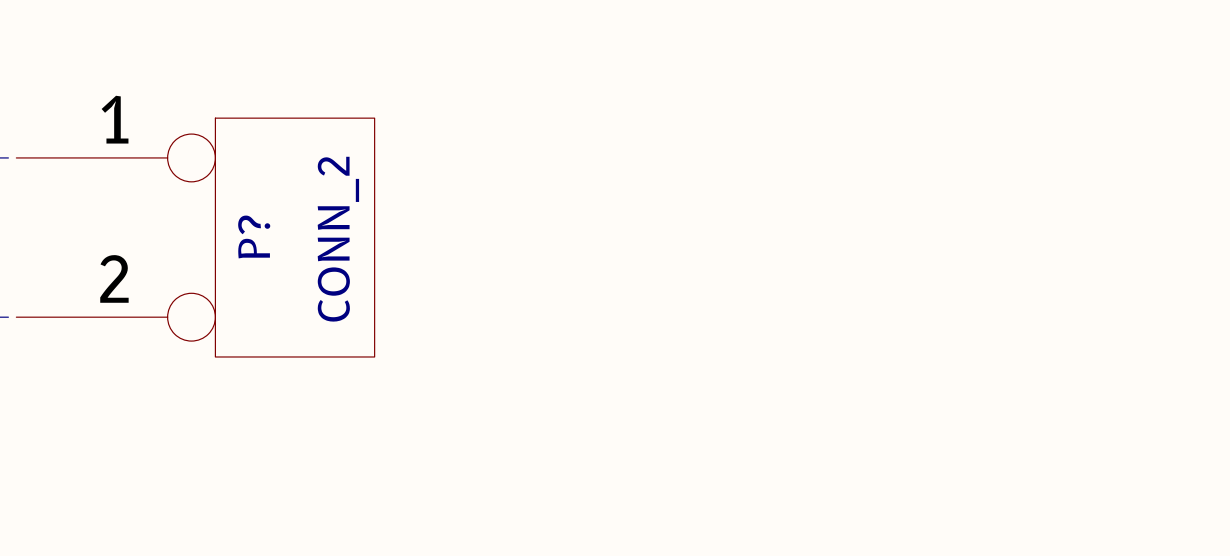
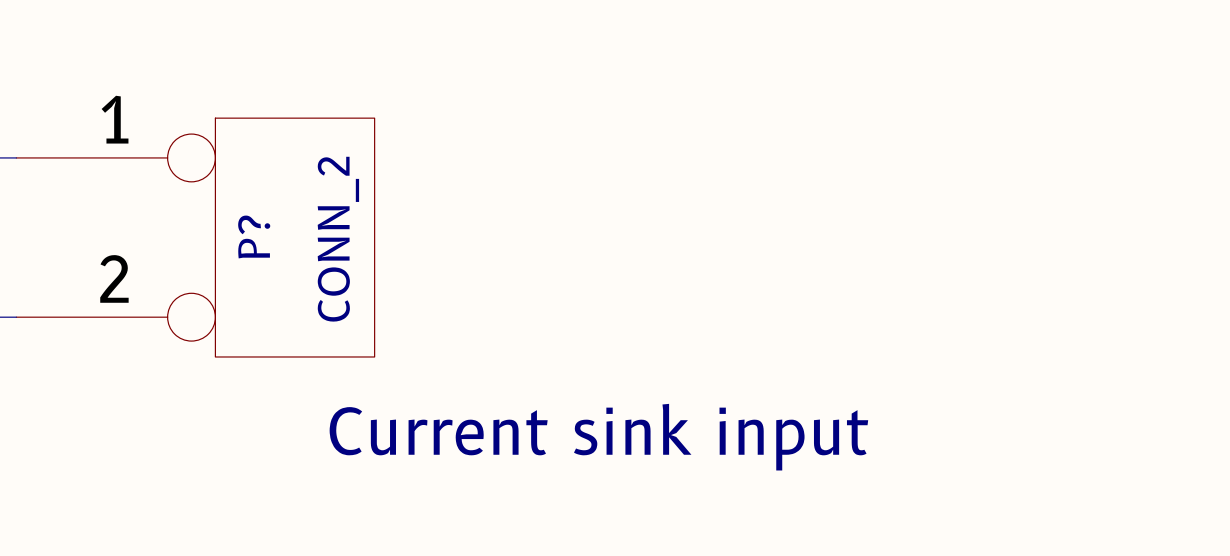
wire: none -> (8, 157) (16, 157)
wire: none -> (8, 317) (16, 317)
text: none -> Current sink input (598, 437)

